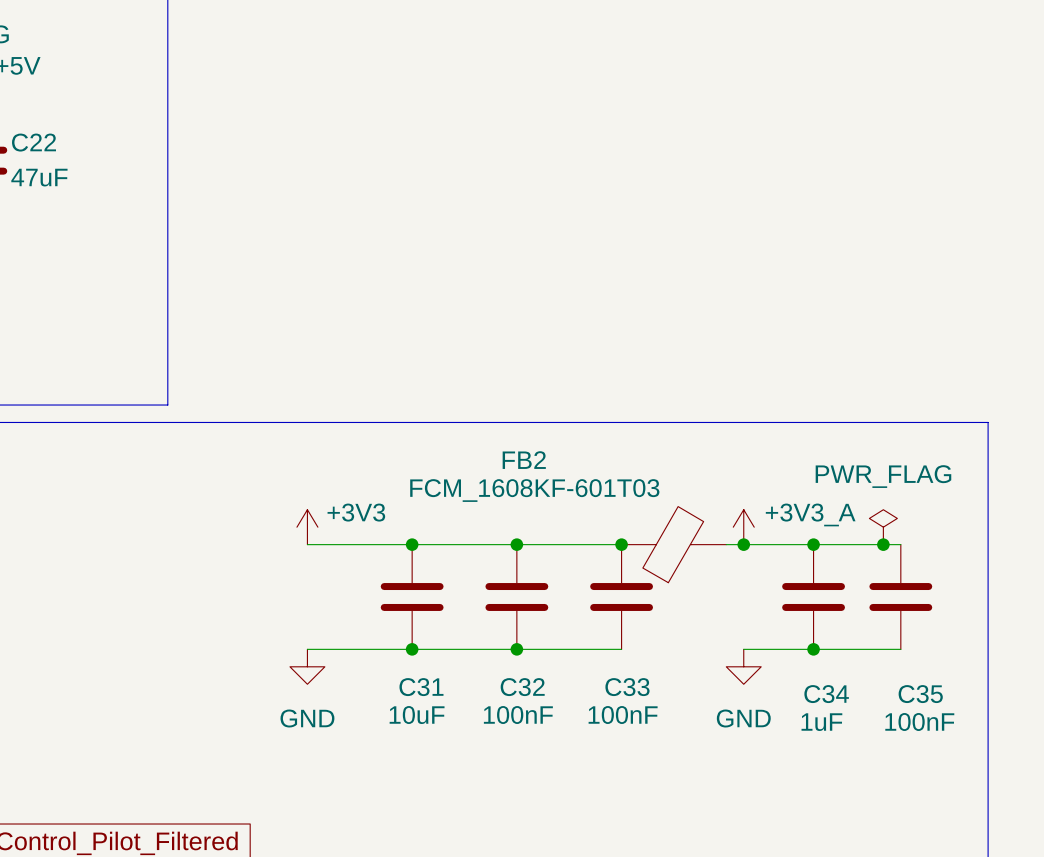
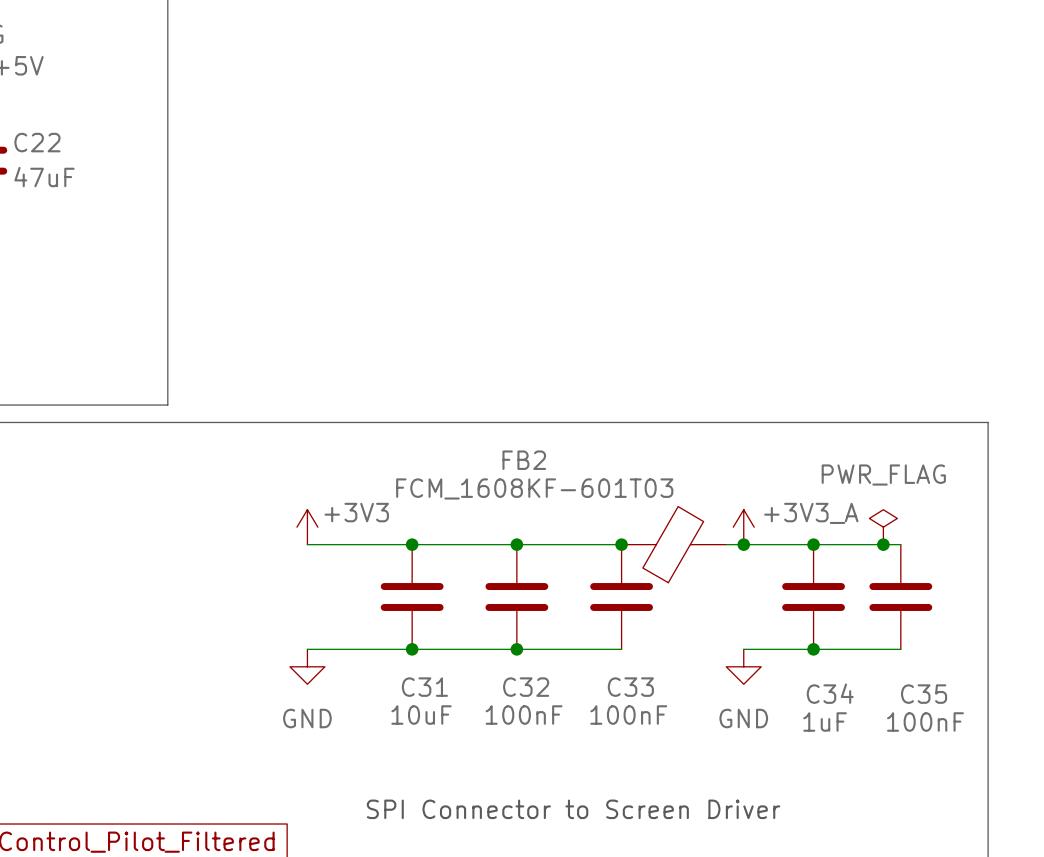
text: none -> SPI Connector to Screen Driver (573, 809)

